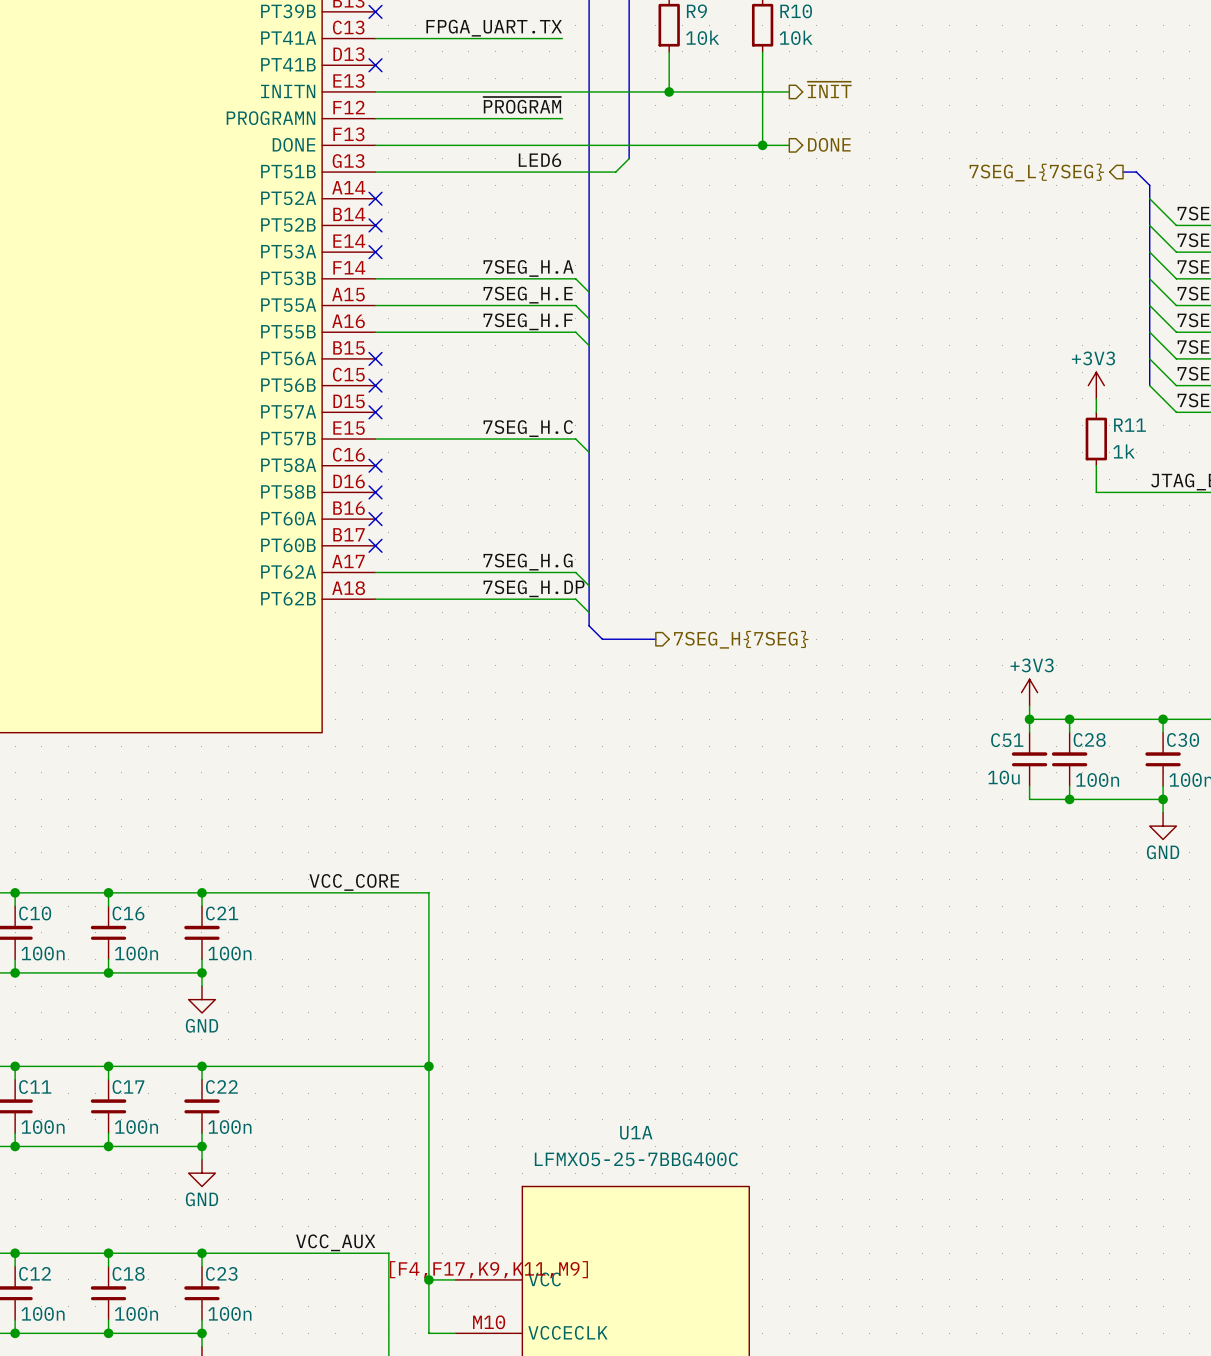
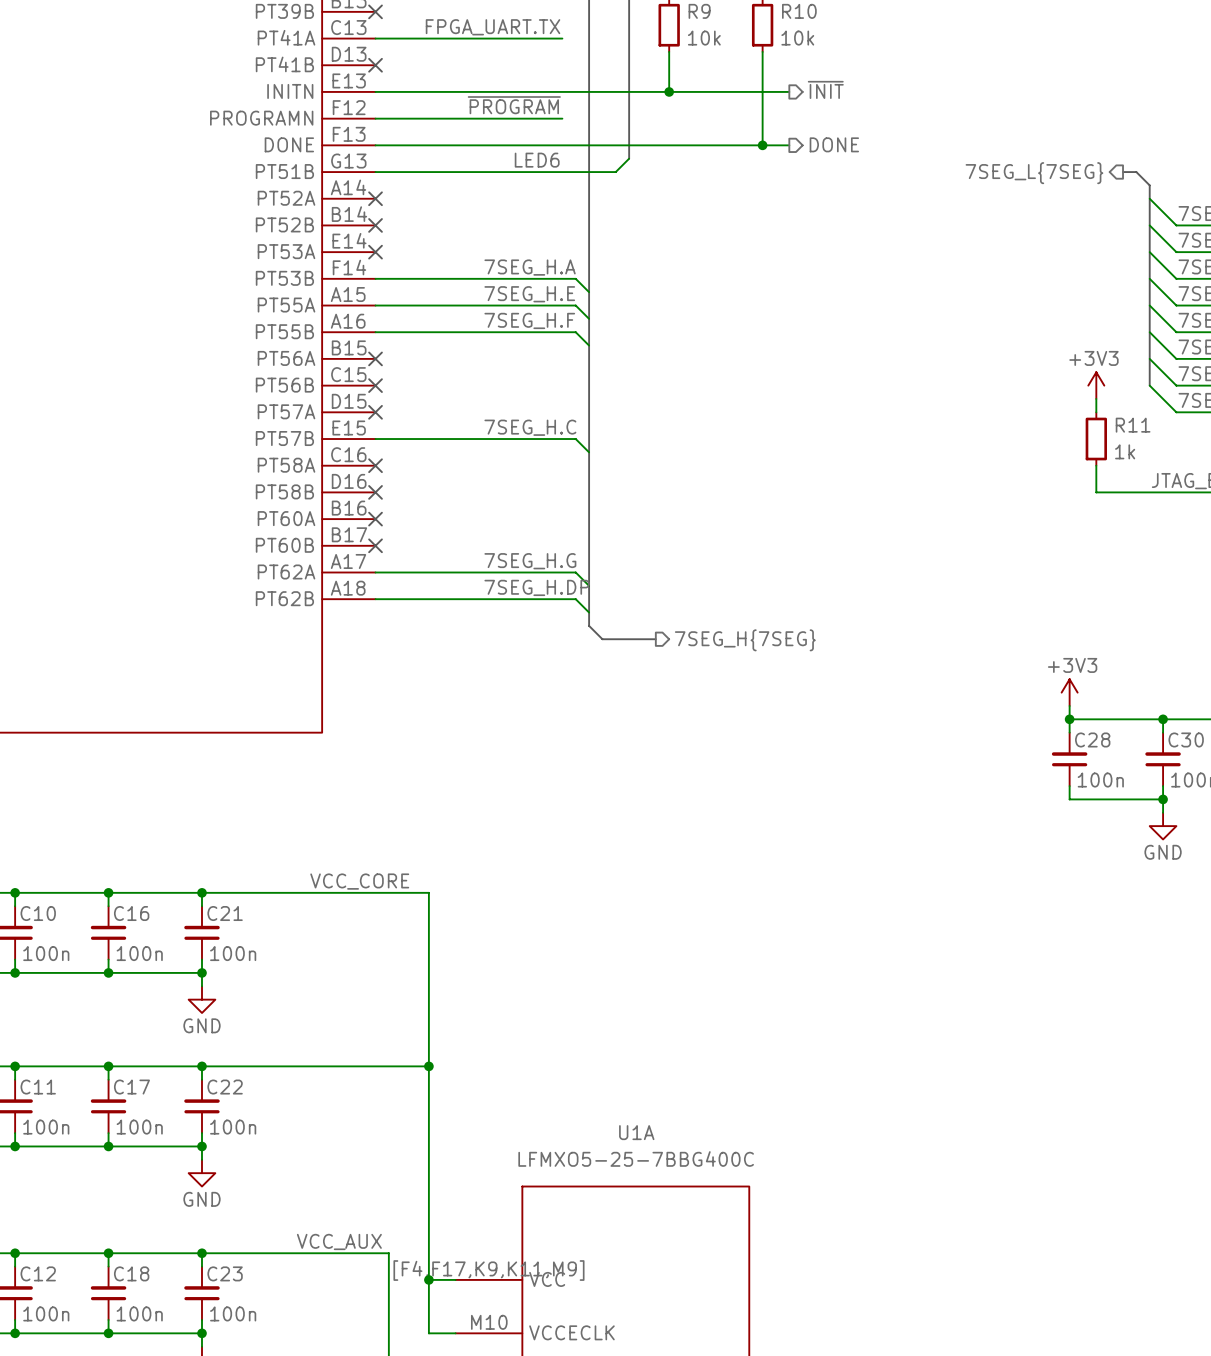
power symbol position: +3V3 (1029, 692) -> +3V3 (1069, 692)
wire: (1029, 705) (1029, 732) -> none
wire: (1029, 719) (1069, 719) -> (1069, 705) (1069, 719)
junction: (1029, 719) -> none
C51: (1029, 759) -> none
wire: (1029, 786) (1029, 799) (1069, 799) -> none
junction: (1069, 799) -> none

